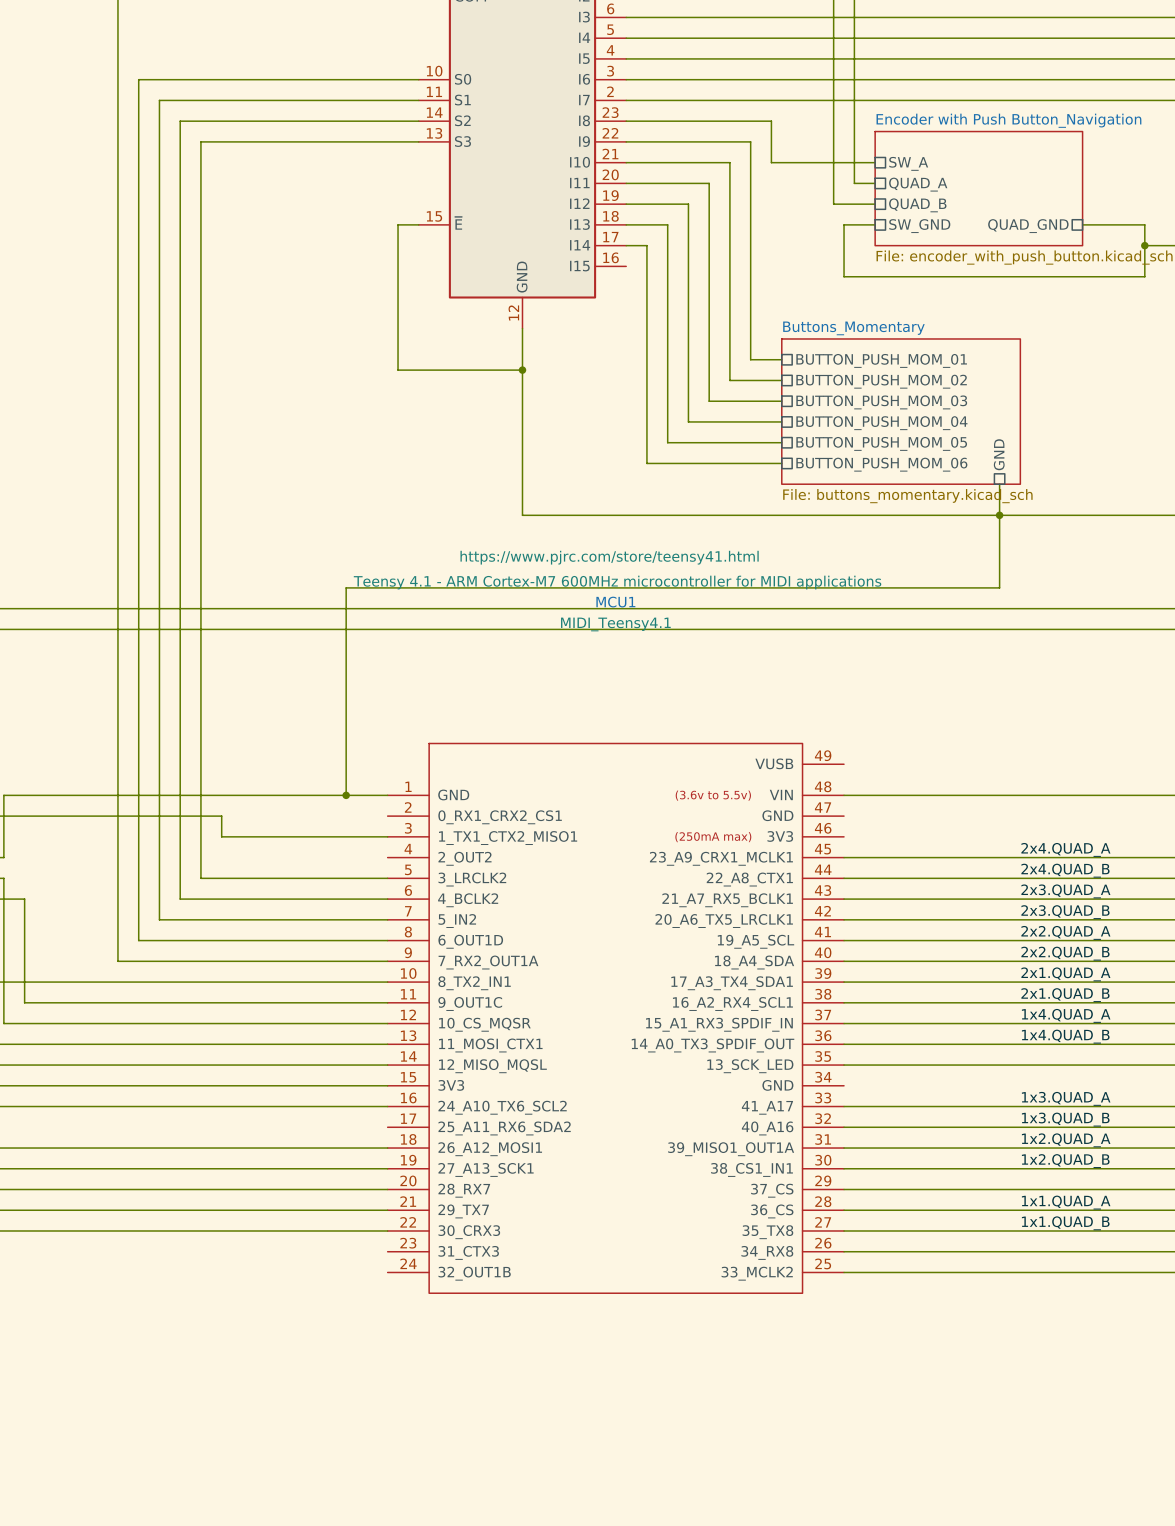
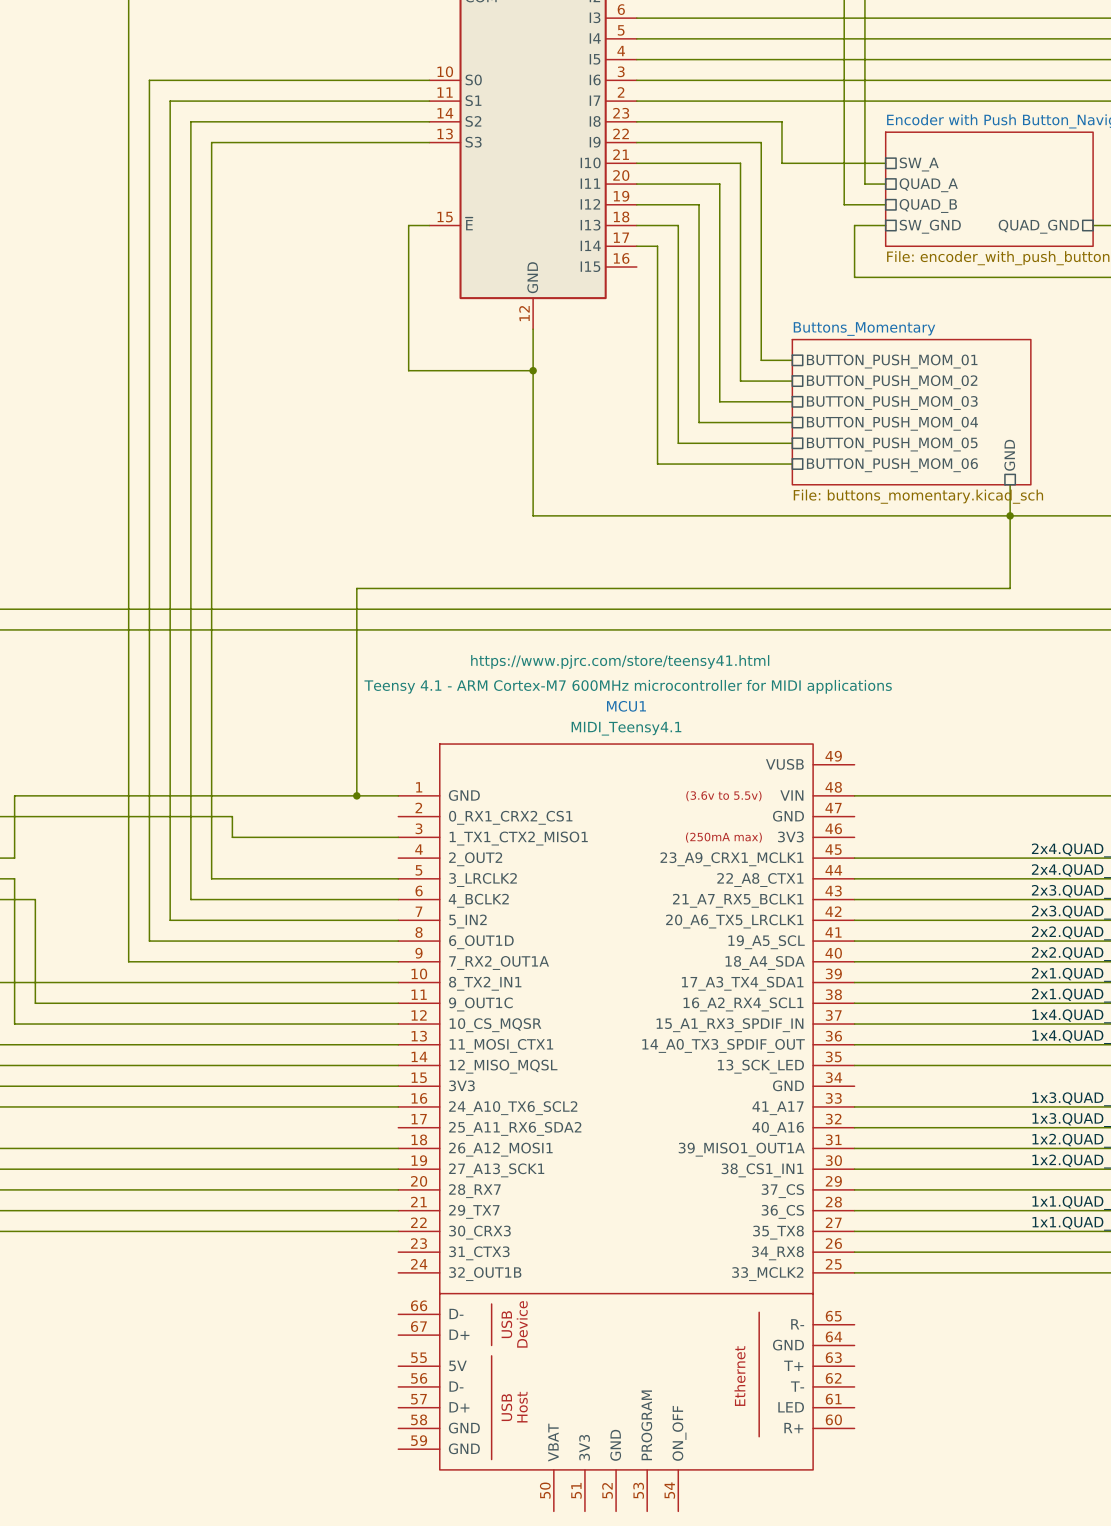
MCU1 symbol: [387, 743, 845, 1294] -> [398, 744, 855, 1512]

